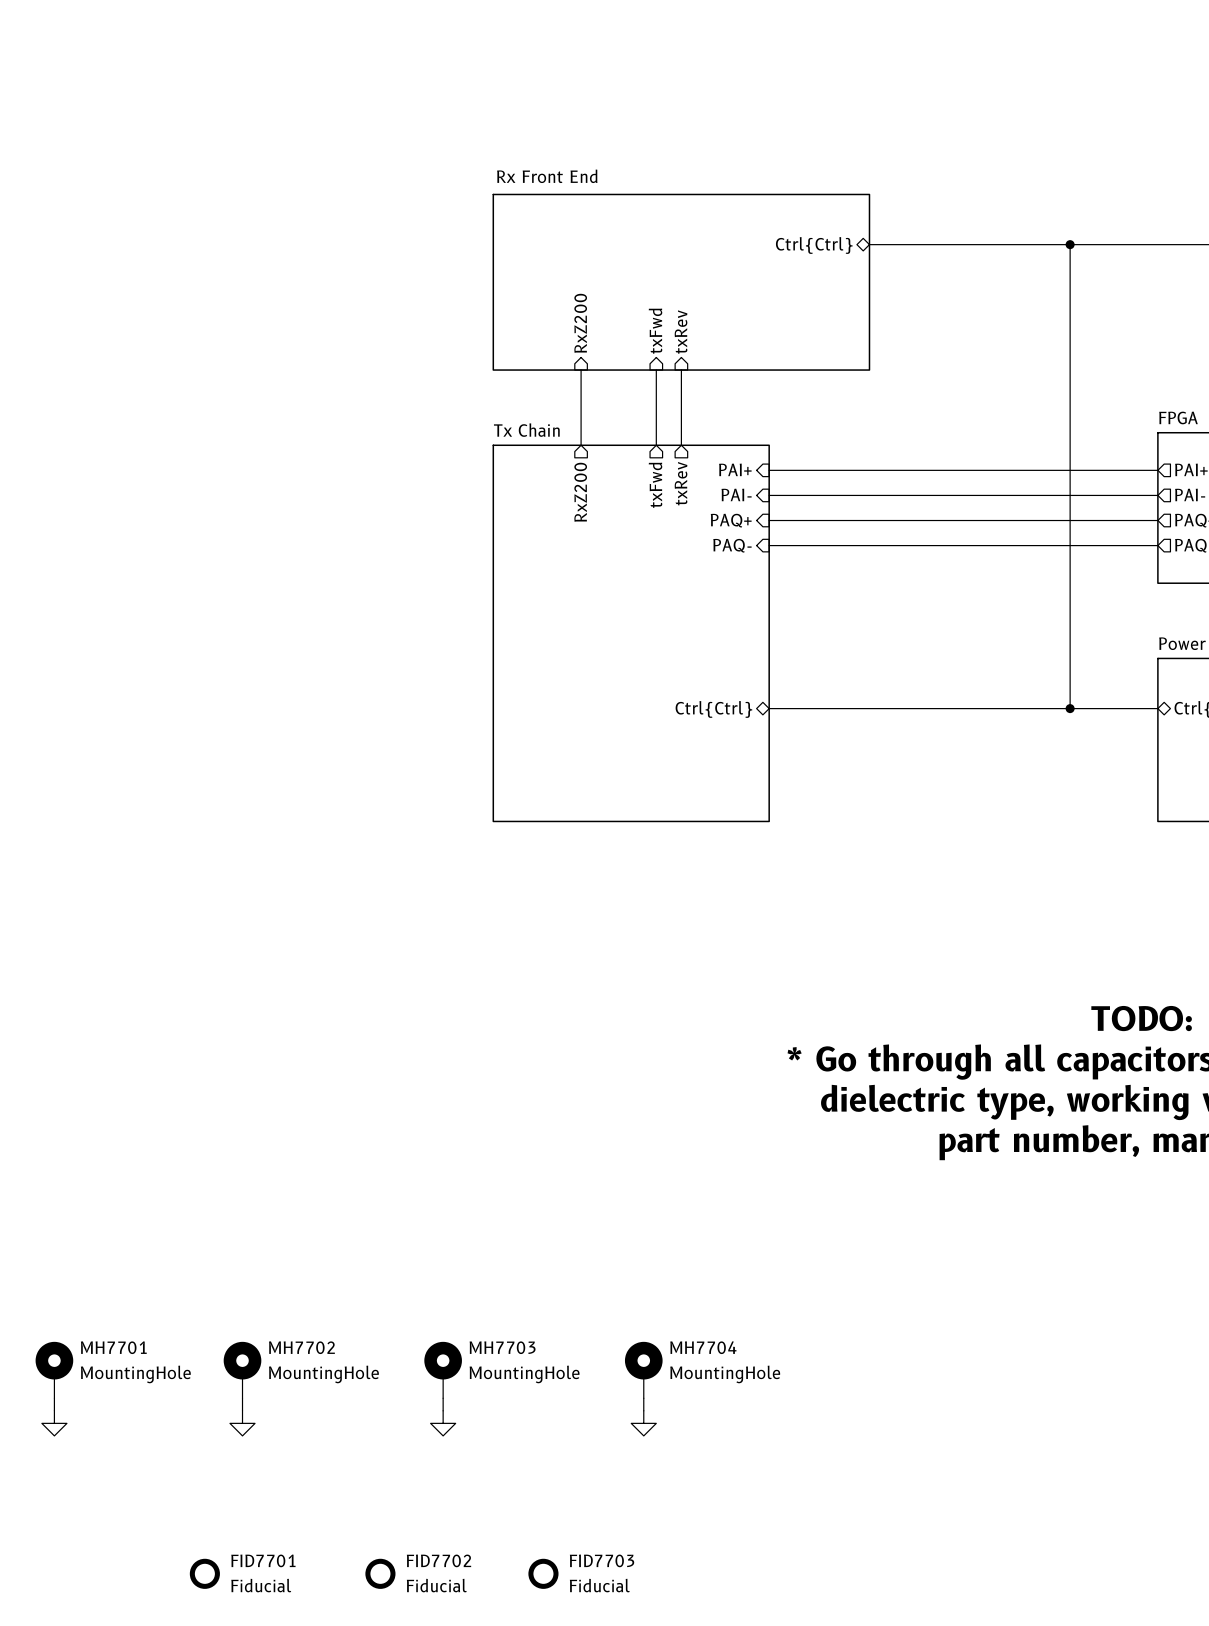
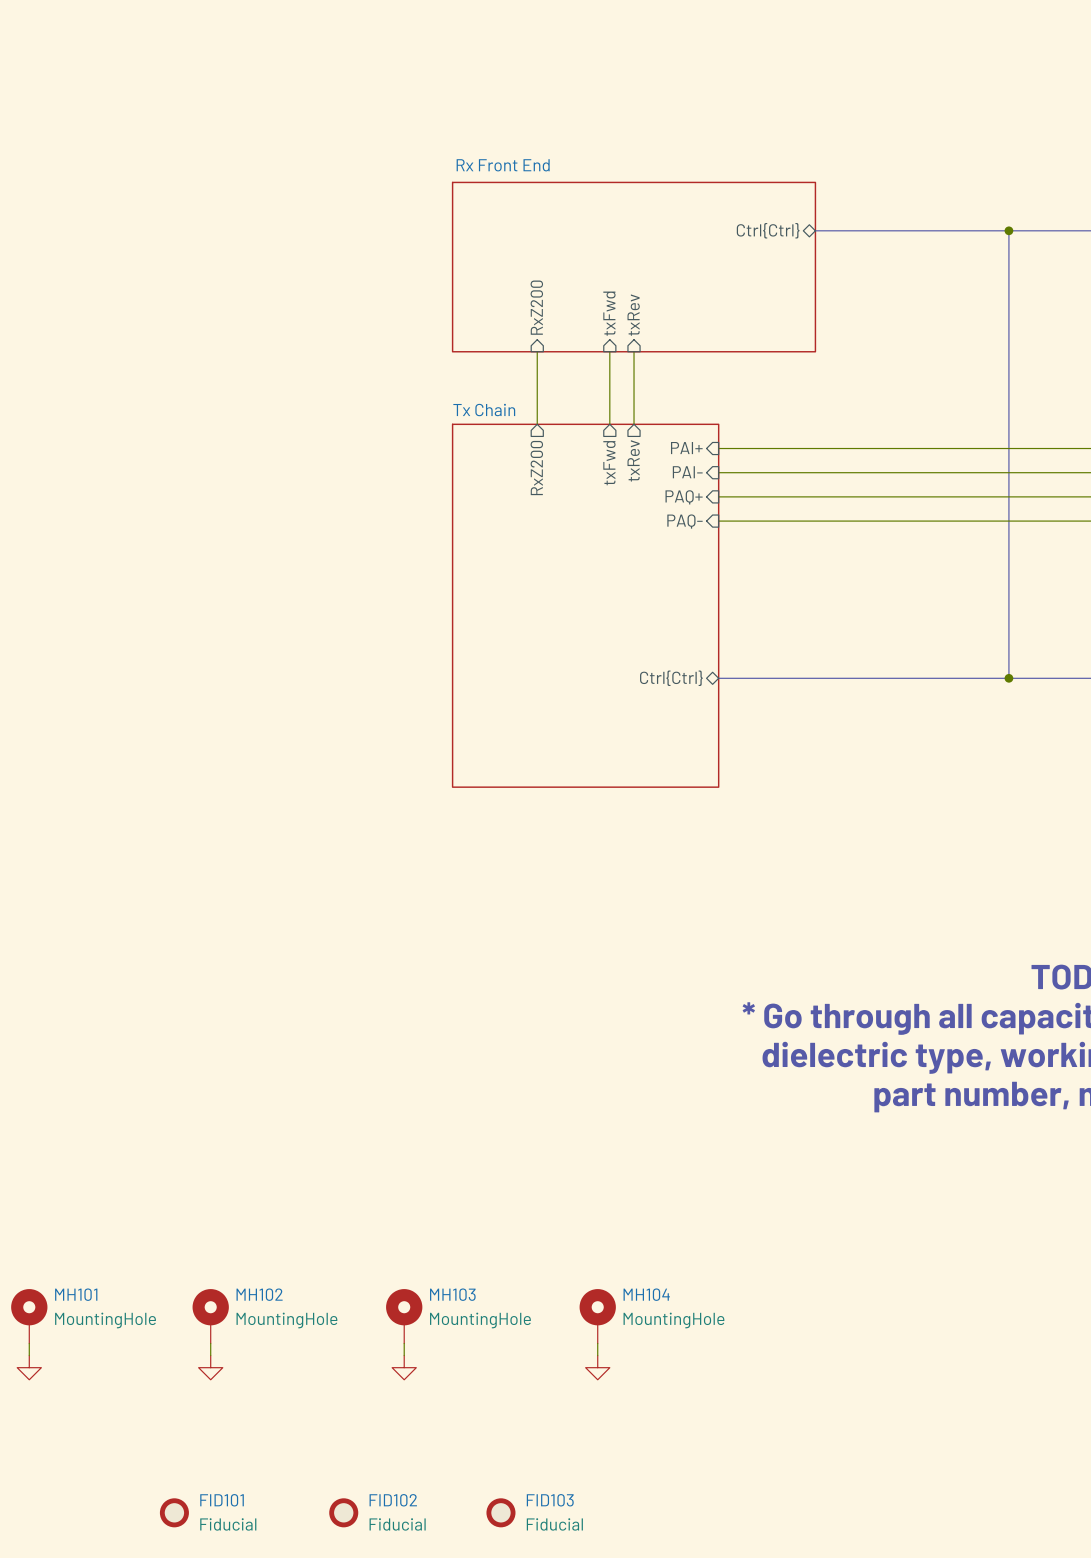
MH7701 name: MH7701 (113, 1347) -> MH101 (76, 1294)
MH7702 name: MH7702 (301, 1347) -> MH102 (259, 1294)
MH7703 name: MH7703 (502, 1347) -> MH103 (452, 1294)
MH7704 name: MH7704 (703, 1347) -> MH104 (646, 1294)
FID7701 name: FID7701 (263, 1560) -> FID101 (222, 1500)
FID7702 name: FID7702 (439, 1560) -> FID102 (393, 1500)
FID7703 name: FID7703 (602, 1560) -> FID103 (550, 1500)

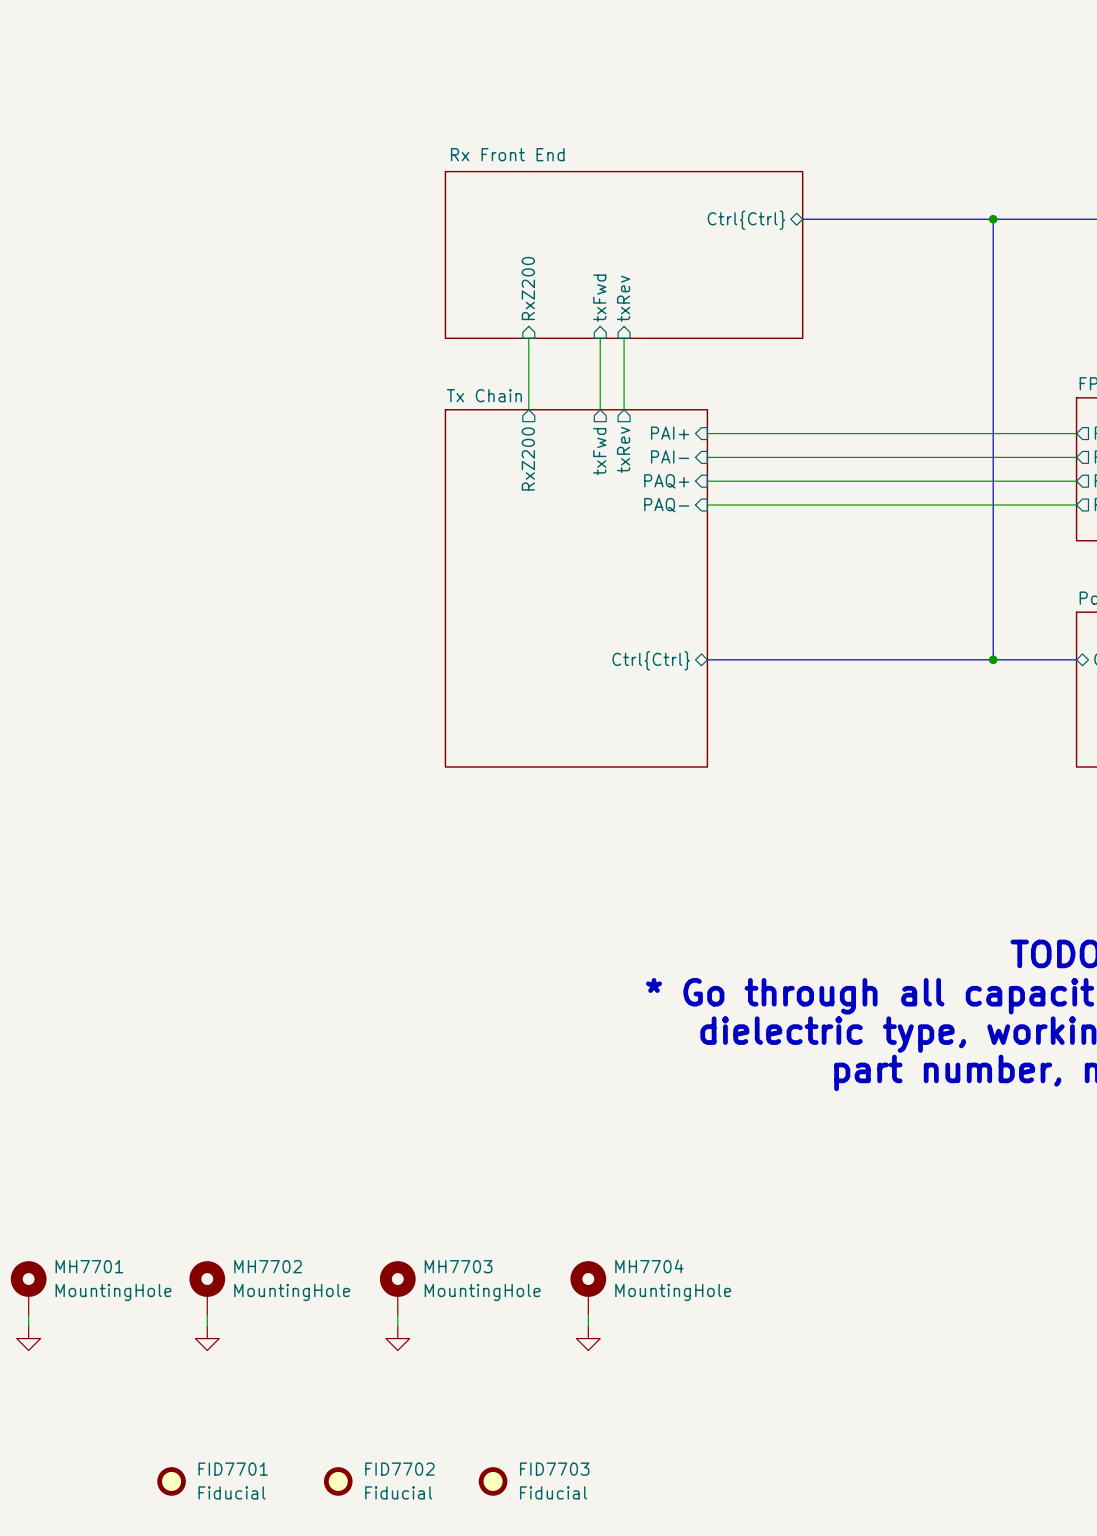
MH101 name: MH101 (76, 1294) -> MH7701 (89, 1266)
MH102 name: MH102 (259, 1294) -> MH7702 (268, 1266)
MH103 name: MH103 (452, 1294) -> MH7703 (458, 1266)
MH104 name: MH104 (646, 1294) -> MH7704 (649, 1266)
FID101 name: FID101 (222, 1500) -> FID7701 (233, 1469)
FID102 name: FID102 (393, 1500) -> FID7702 (399, 1469)
FID103 name: FID103 (550, 1500) -> FID7703 (554, 1469)

